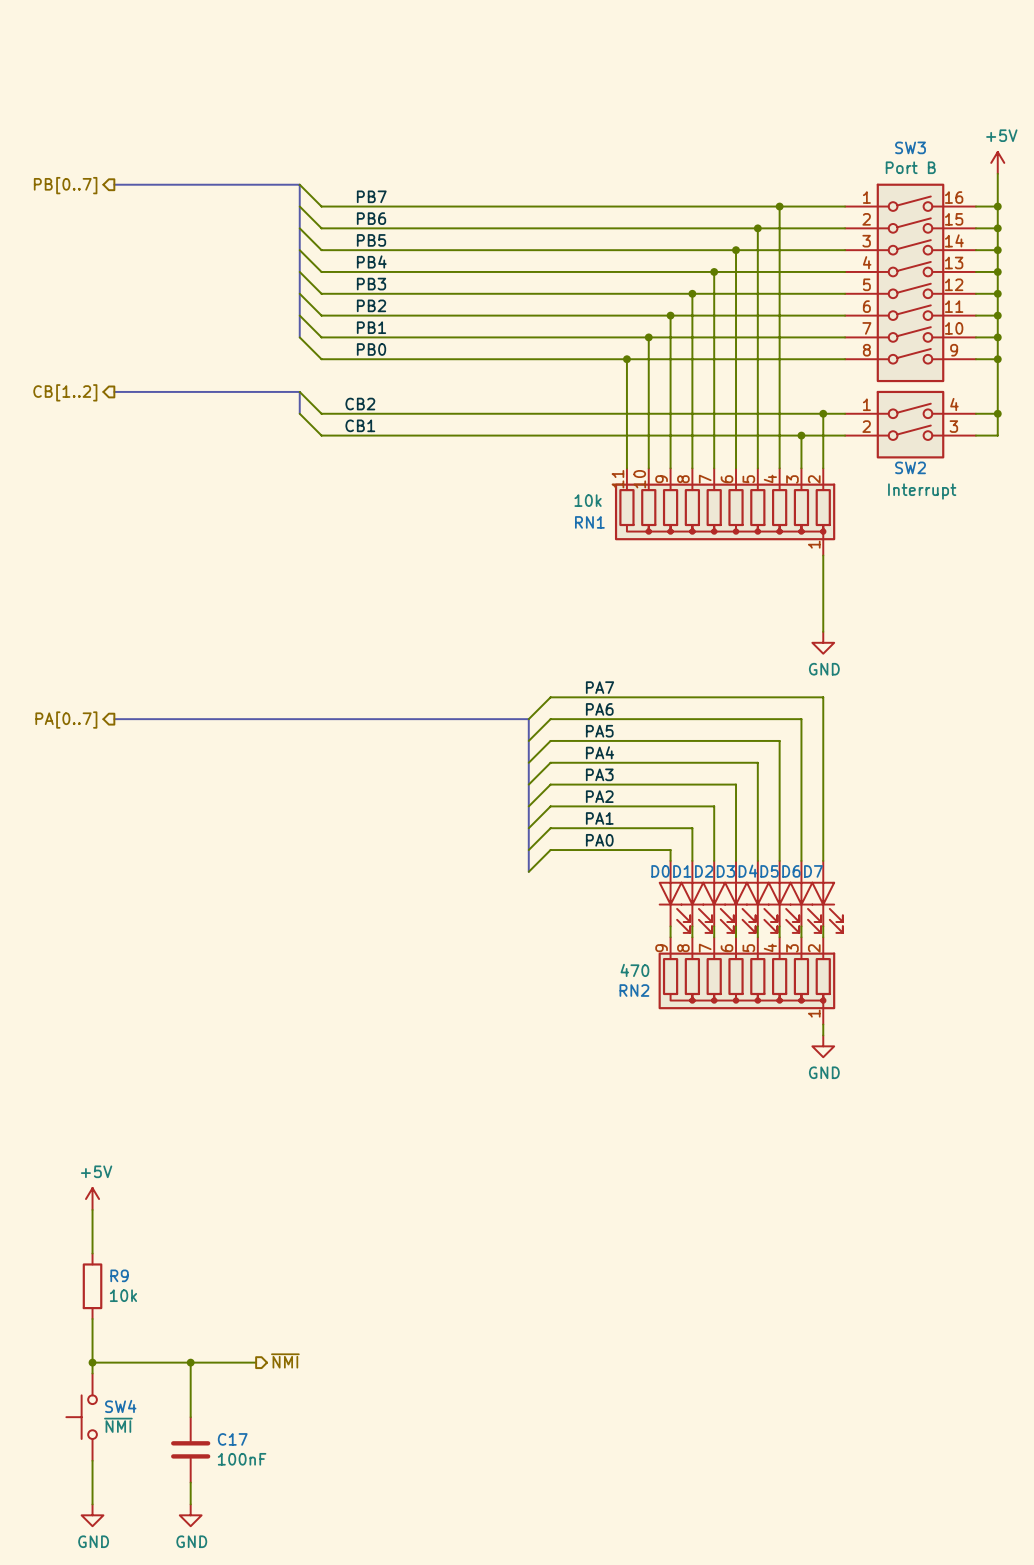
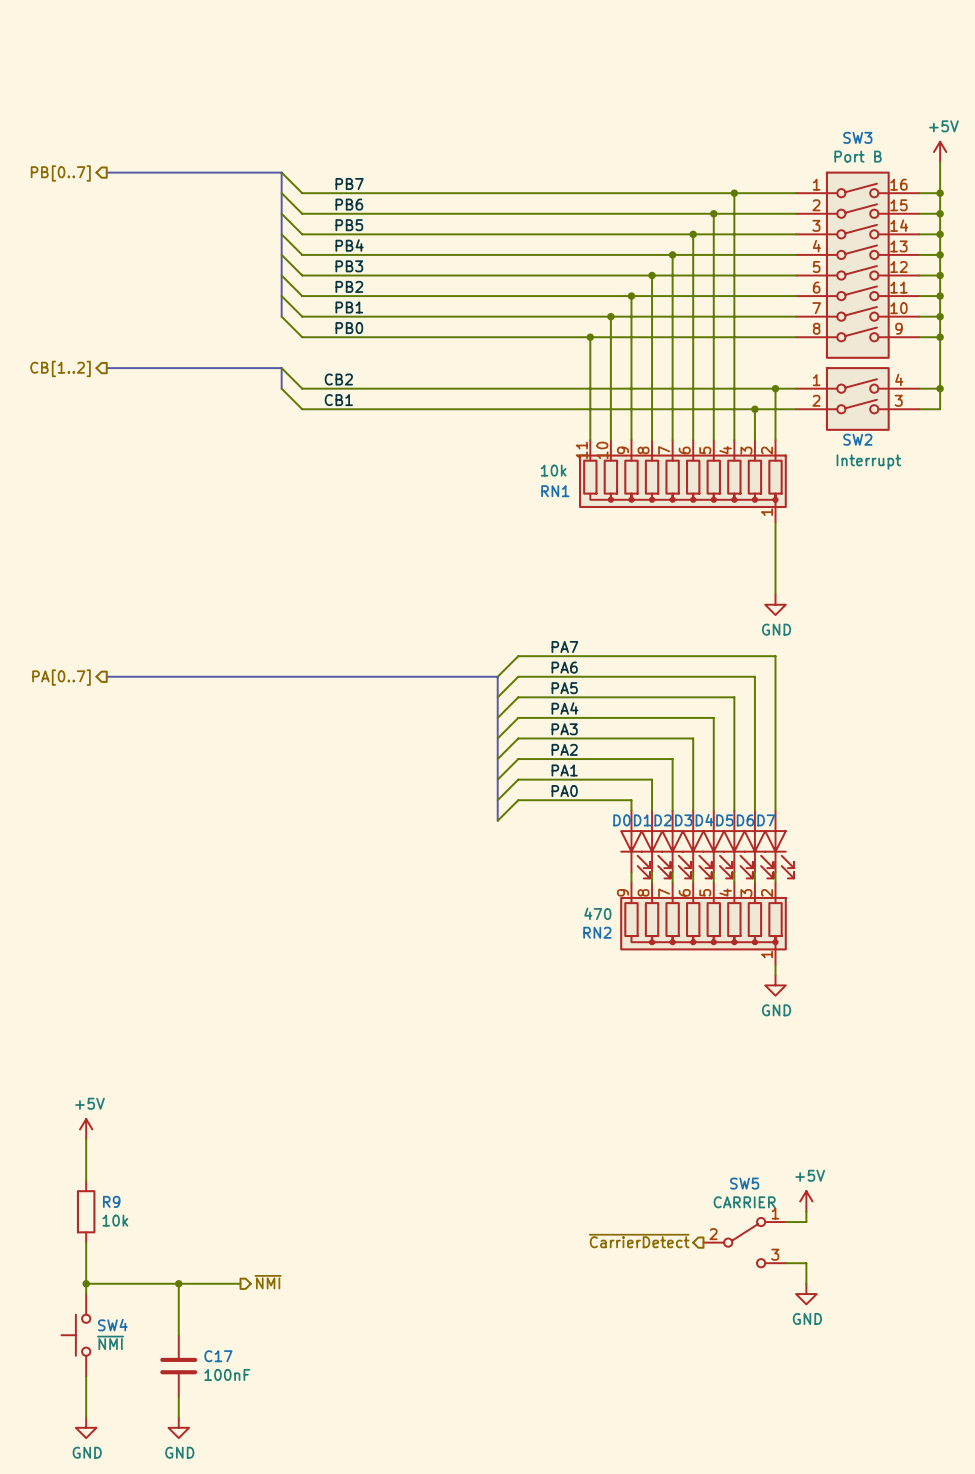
power symbol: none -> +5V (806, 1201)
wire: none -> (806, 1211) (806, 1222) (785, 1222)
hierarchical label: none -> ~{CarrierDetect} (639, 1241)
SW5: none -> CARRIER (744, 1242)
wire: none -> (785, 1263) (806, 1263) (806, 1283)
power symbol: none -> GND (806, 1294)

